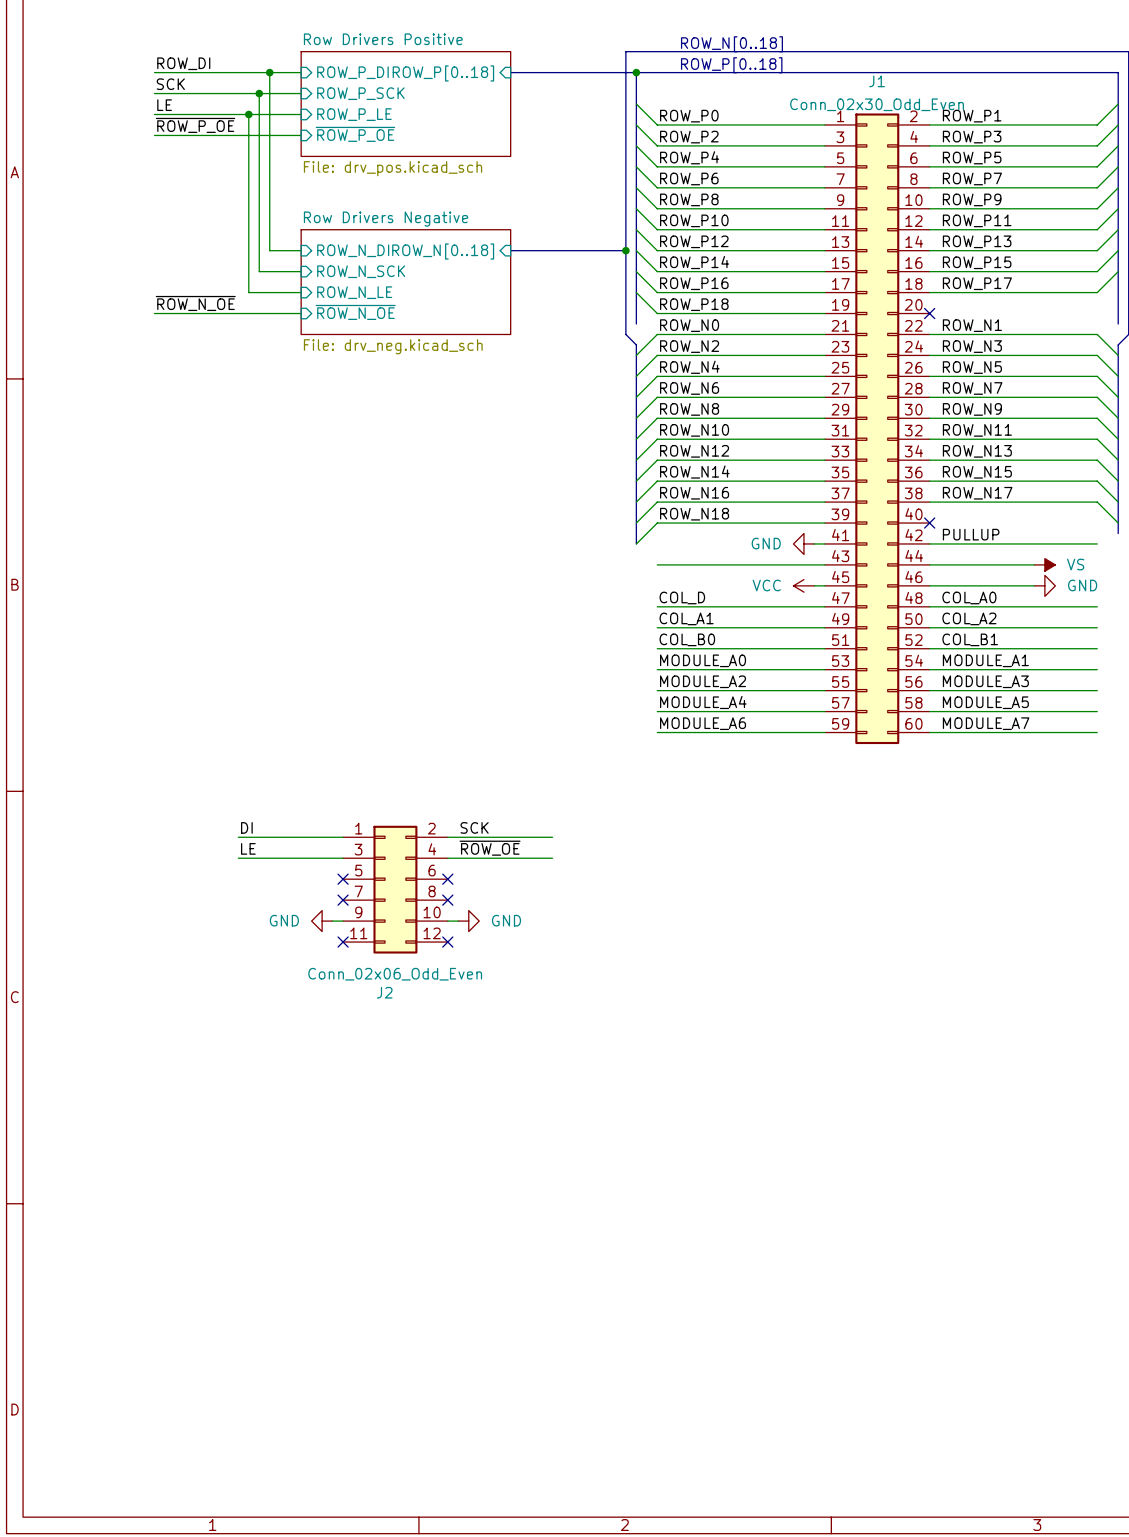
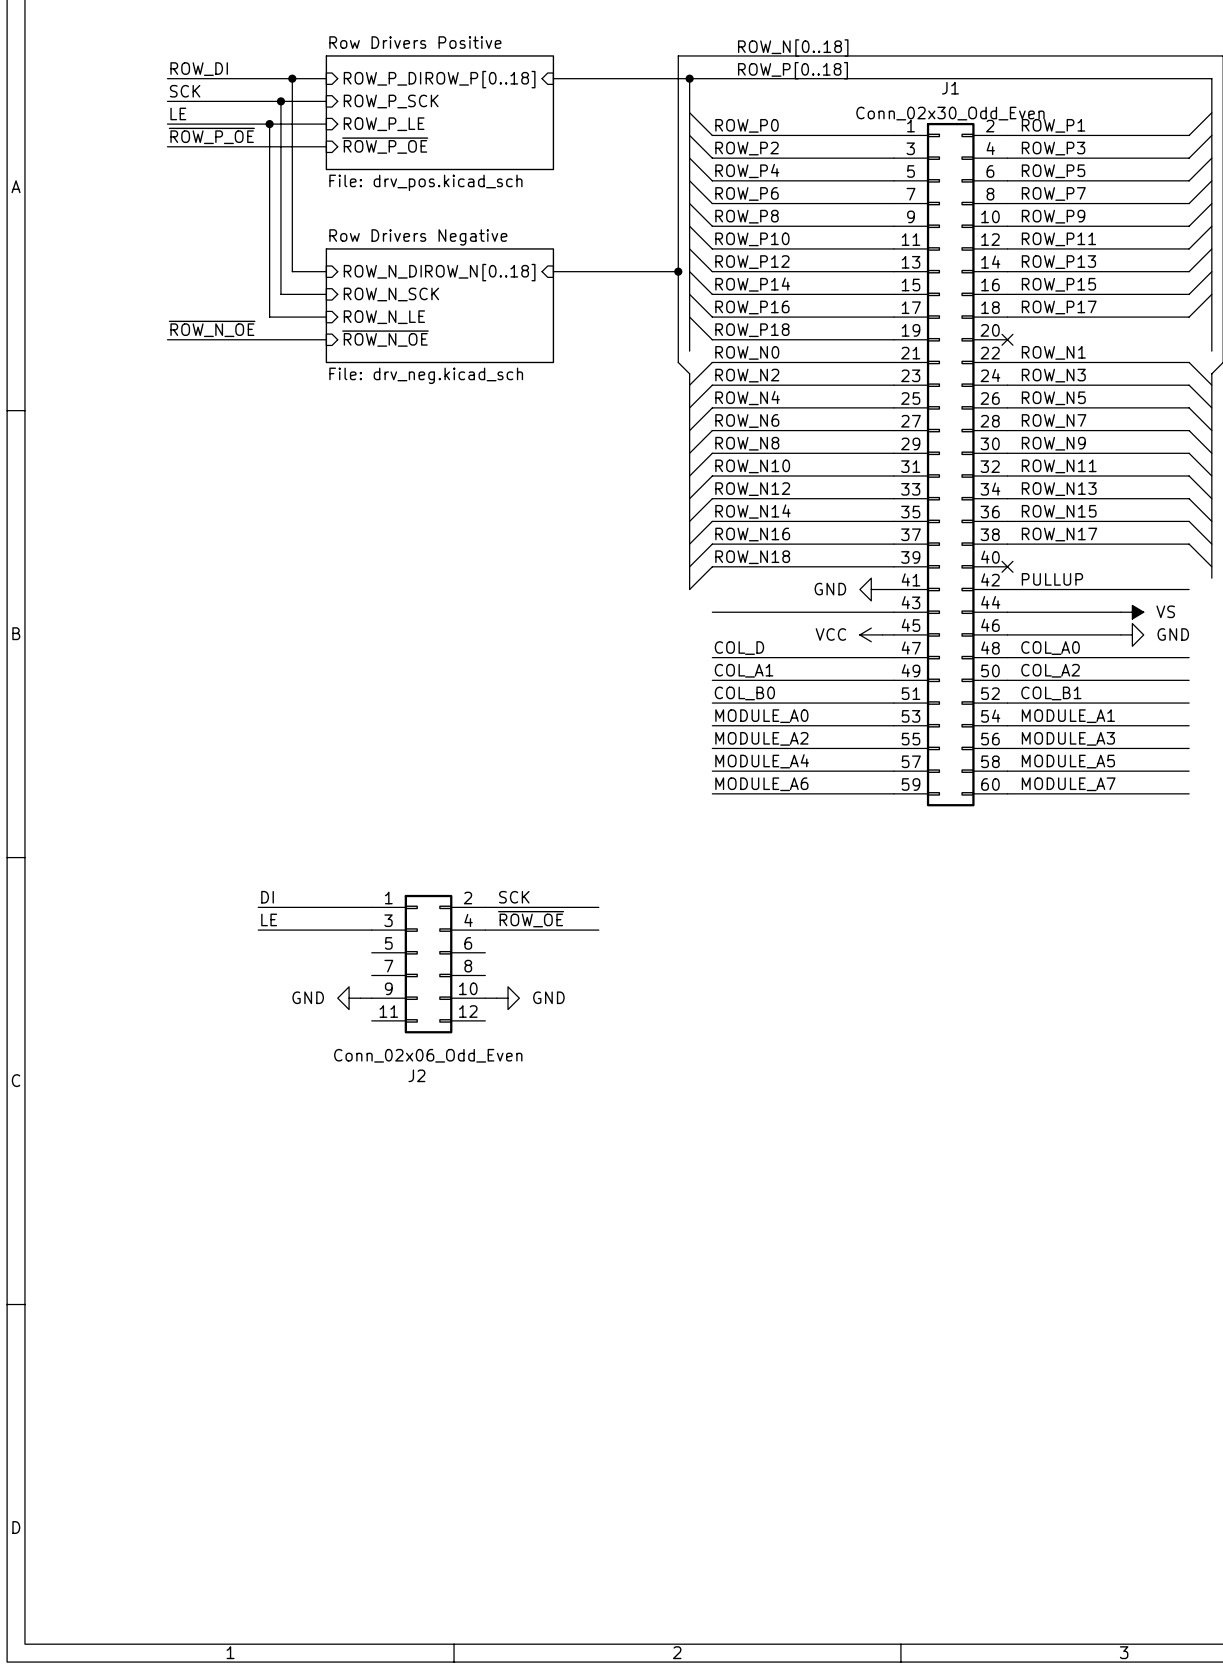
no-connect mark: (343, 879) -> none
no-connect mark: (447, 879) -> none
no-connect mark: (343, 900) -> none
no-connect mark: (447, 900) -> none
no-connect mark: (343, 942) -> none
no-connect mark: (447, 942) -> none

